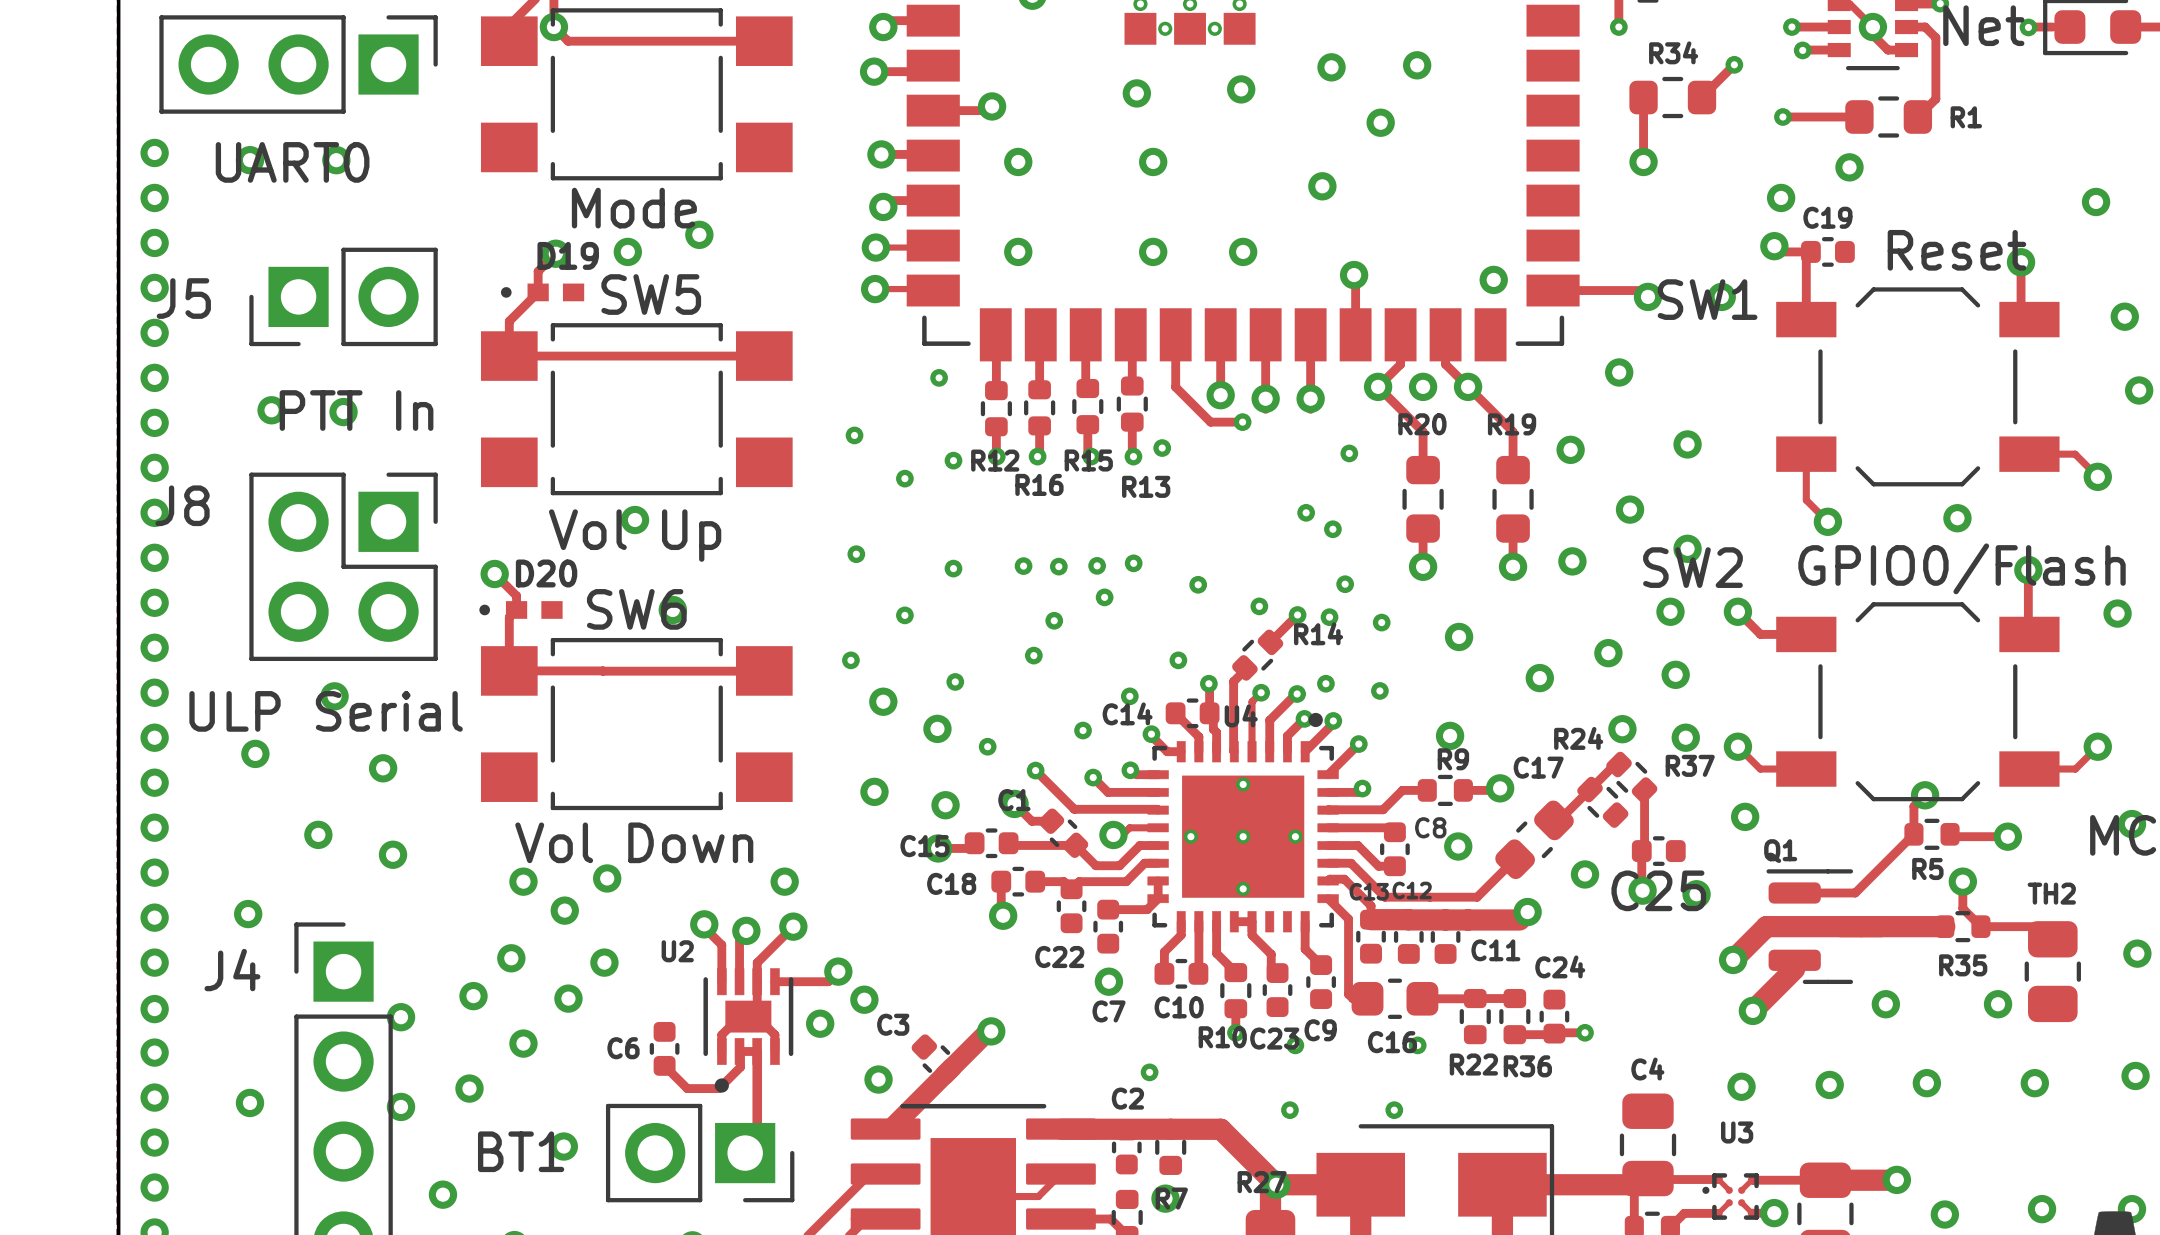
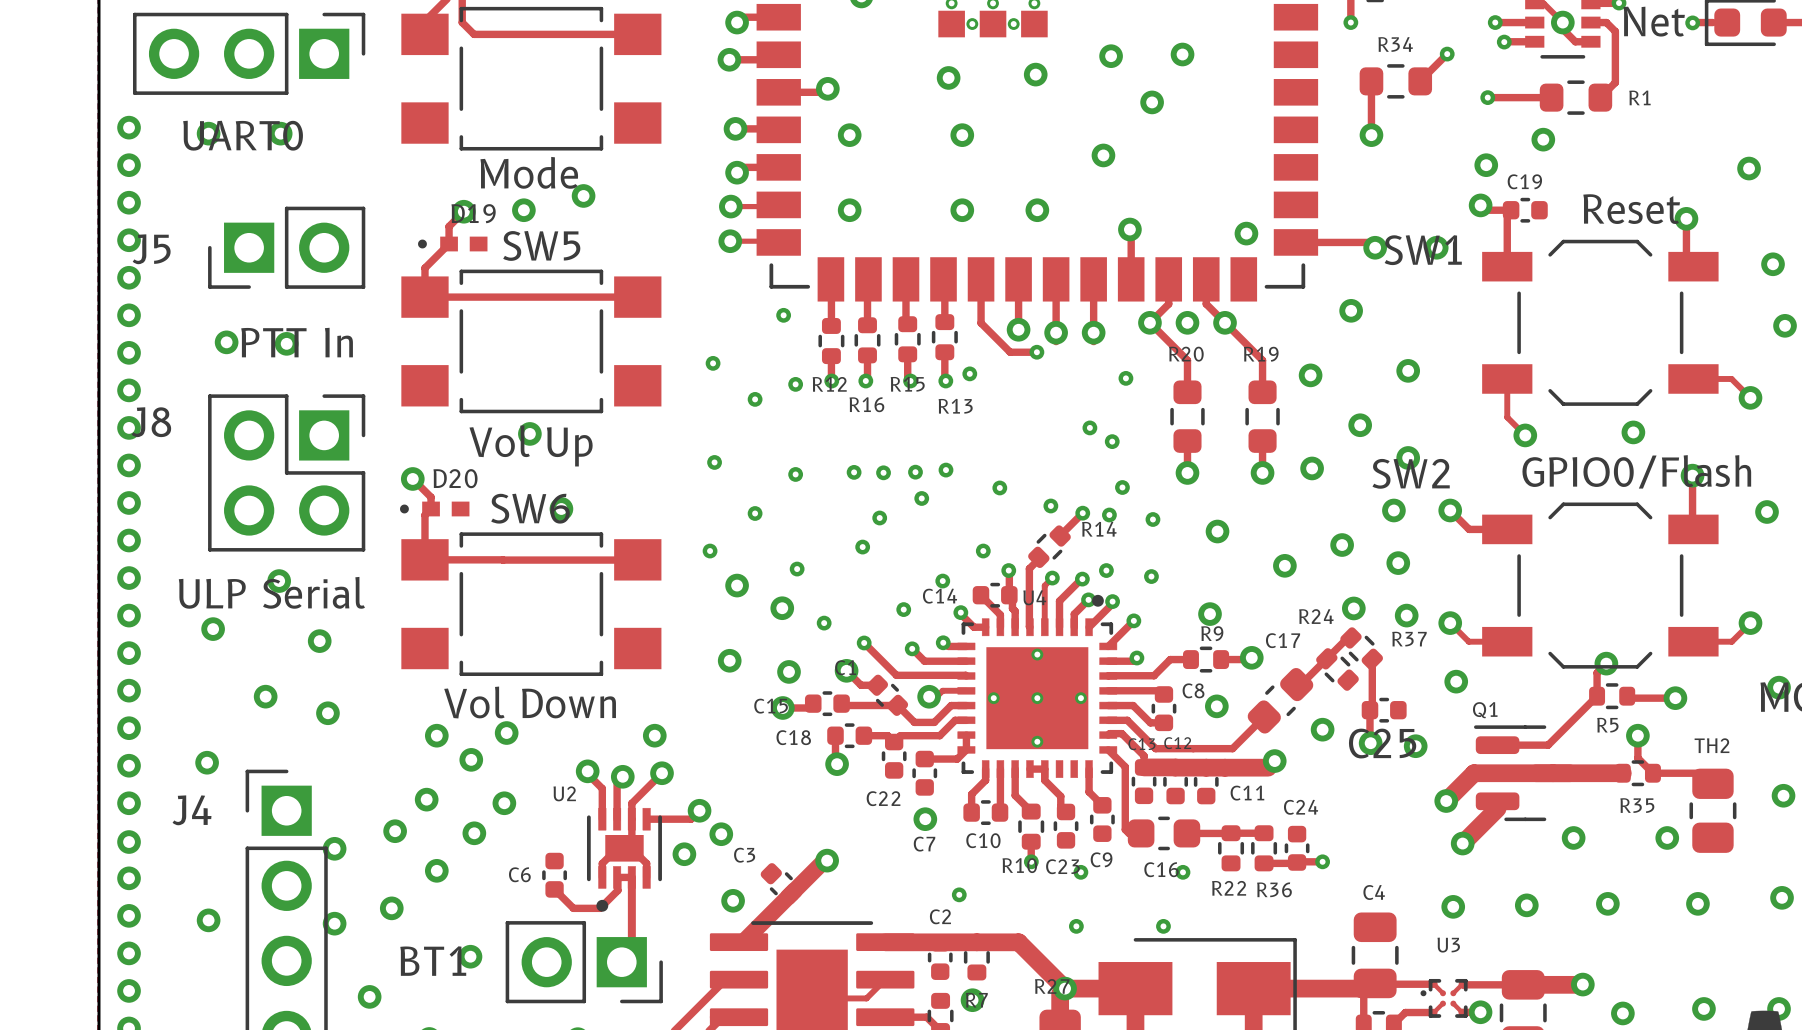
via: (553, 27) -> none

